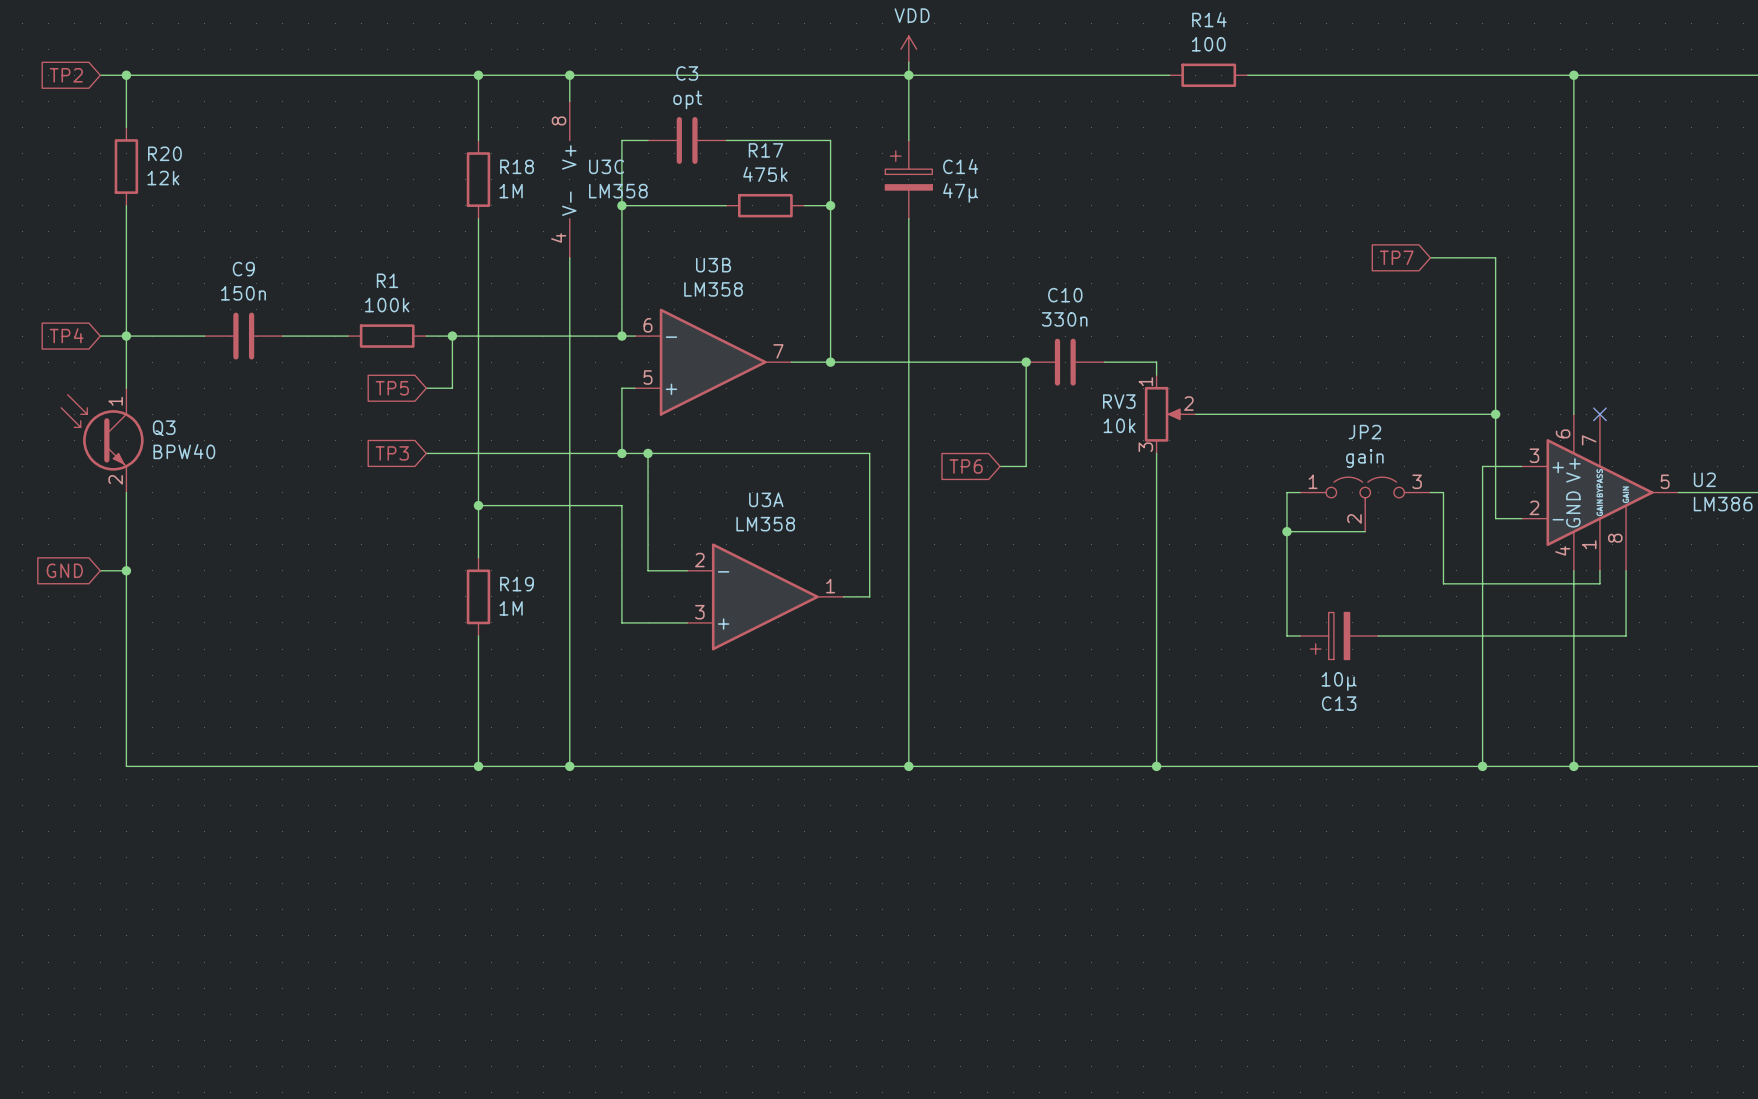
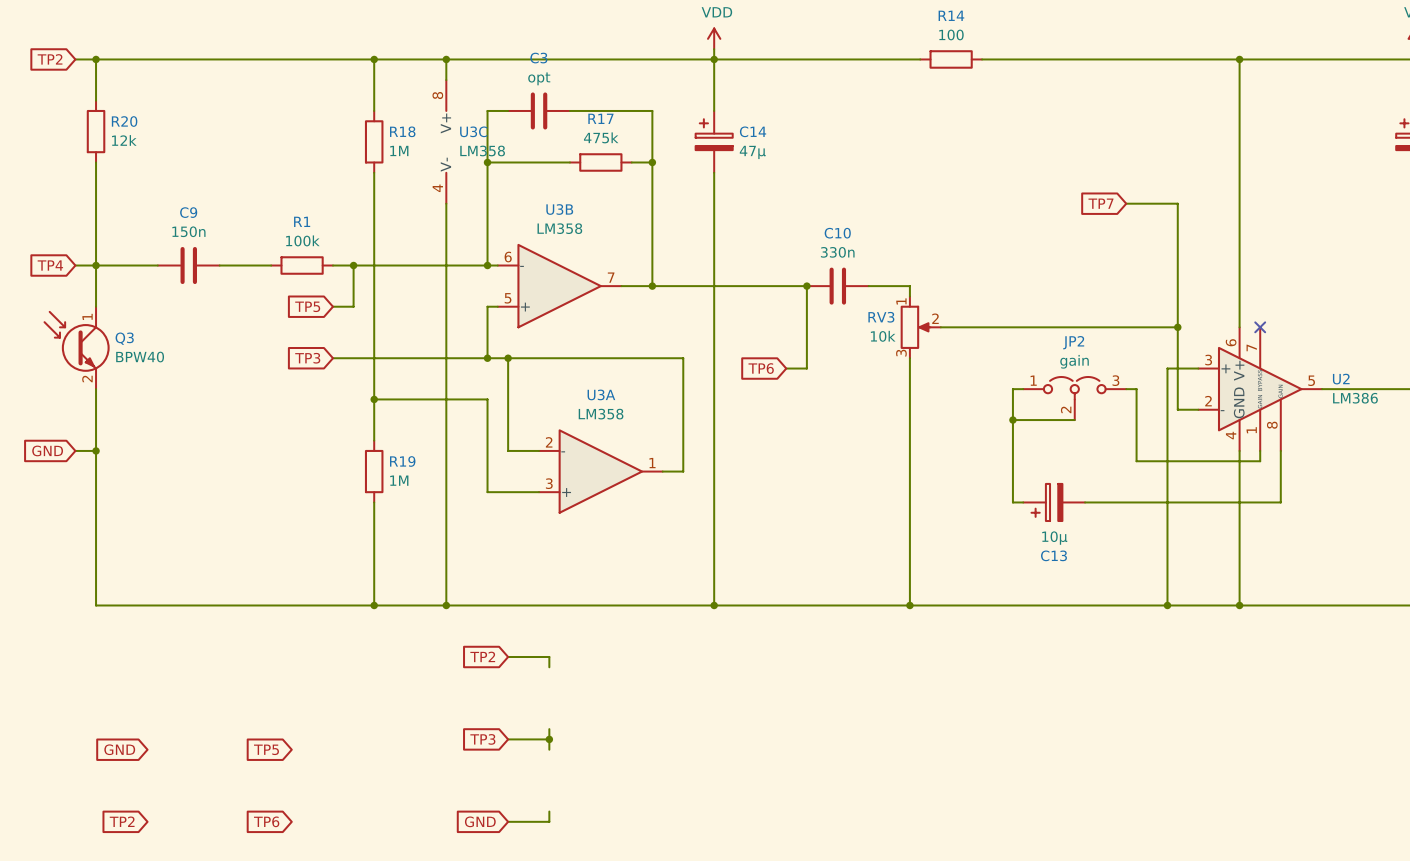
global label: none -> TP2 (482, 656)
wire: none -> (508, 657) (549, 657) (549, 667)
wire: none -> (549, 729) (549, 749)
global label: none -> TP3 (482, 739)
wire: none -> (508, 739) (549, 739)
junction: none -> (549, 739)
global label: none -> GND (119, 749)
global label: none -> TP5 (266, 749)
wire: none -> (549, 811) (549, 821) (508, 821)
global label: none -> TP2 (122, 821)
global label: none -> TP6 (266, 821)
global label: none -> GND (480, 821)

